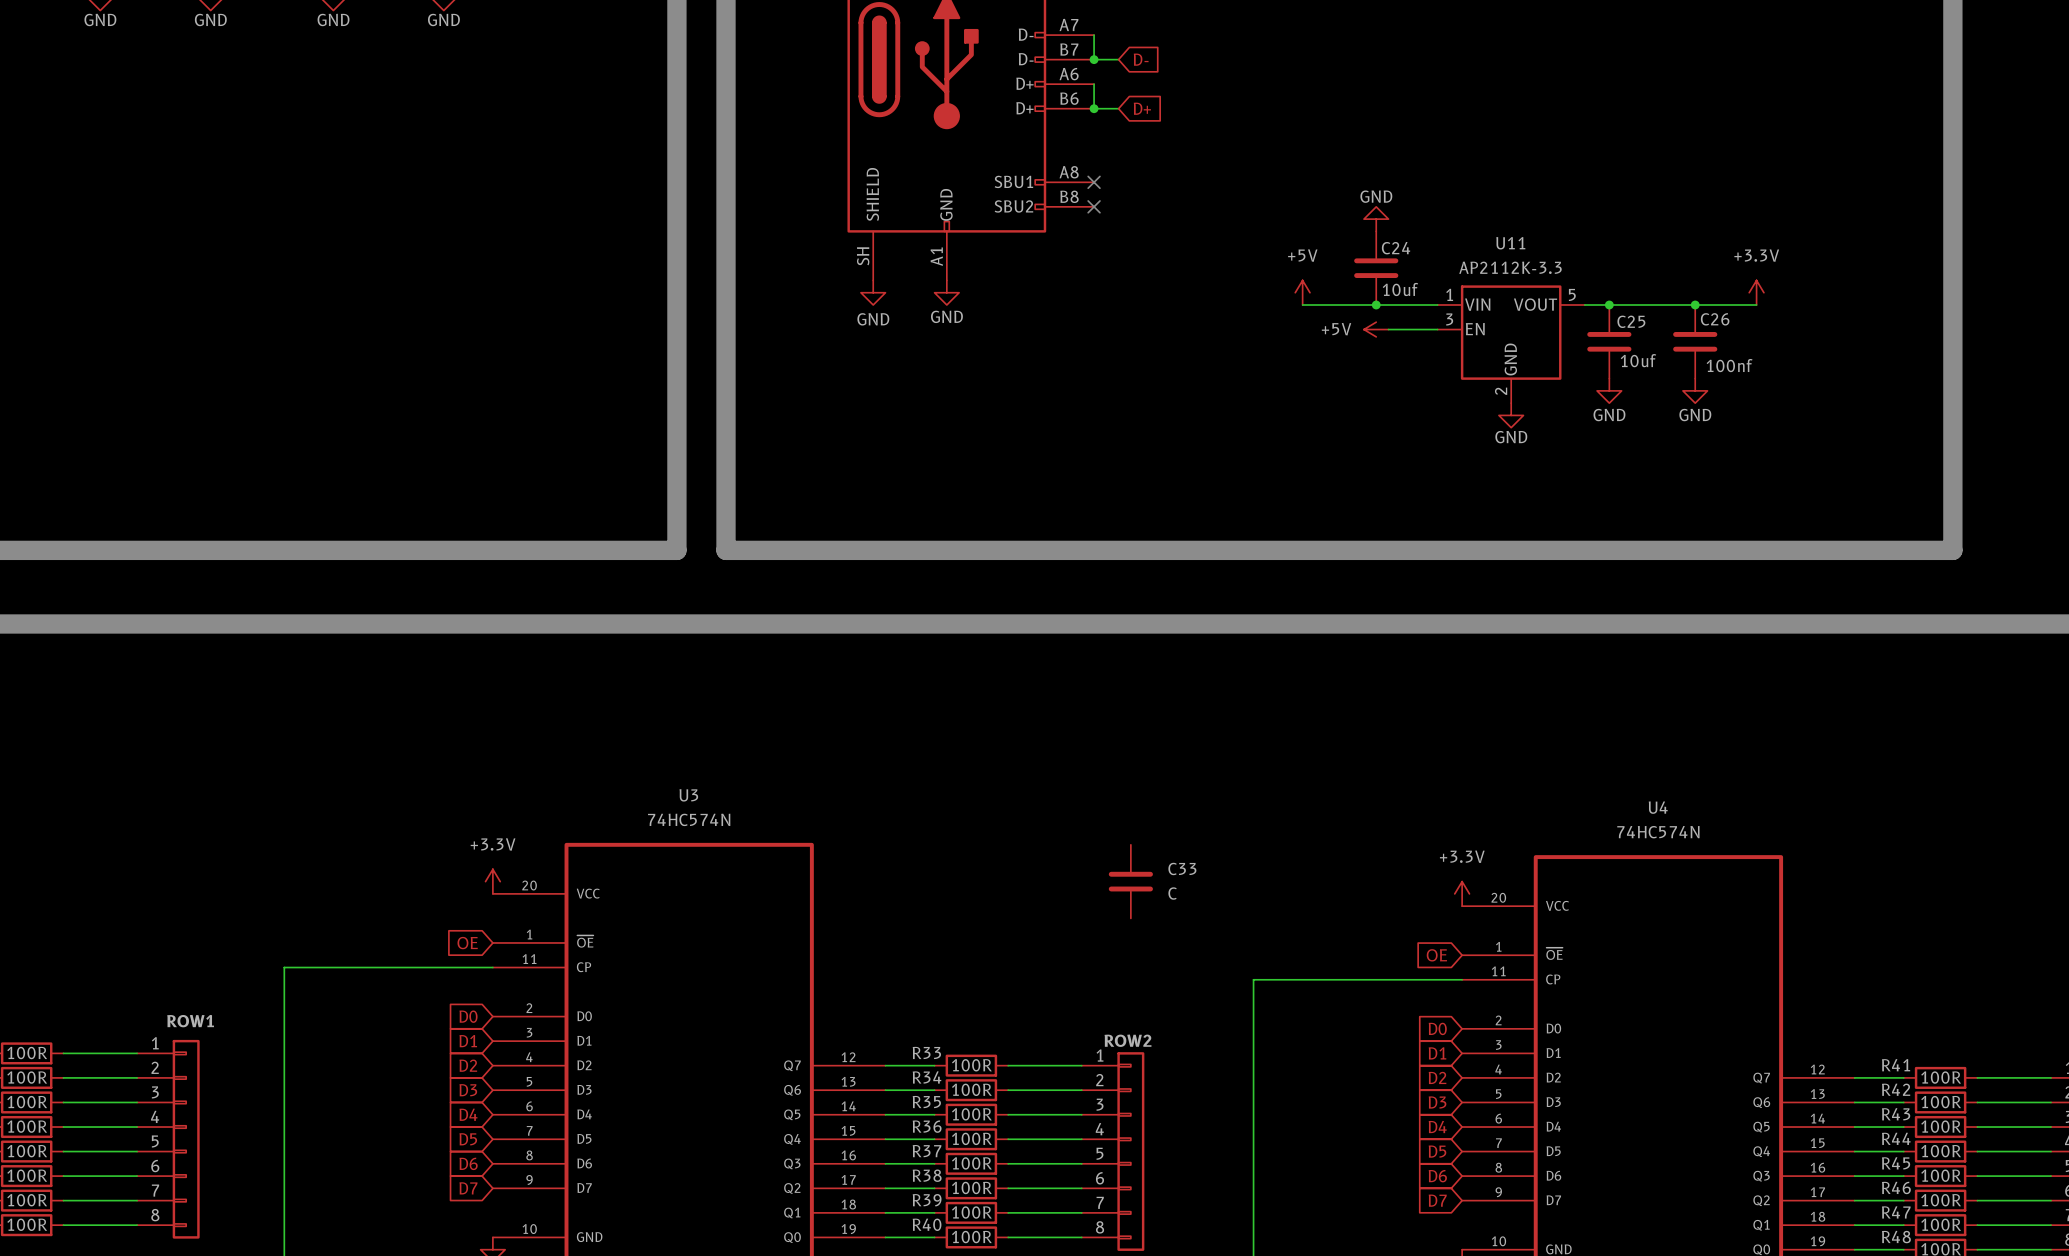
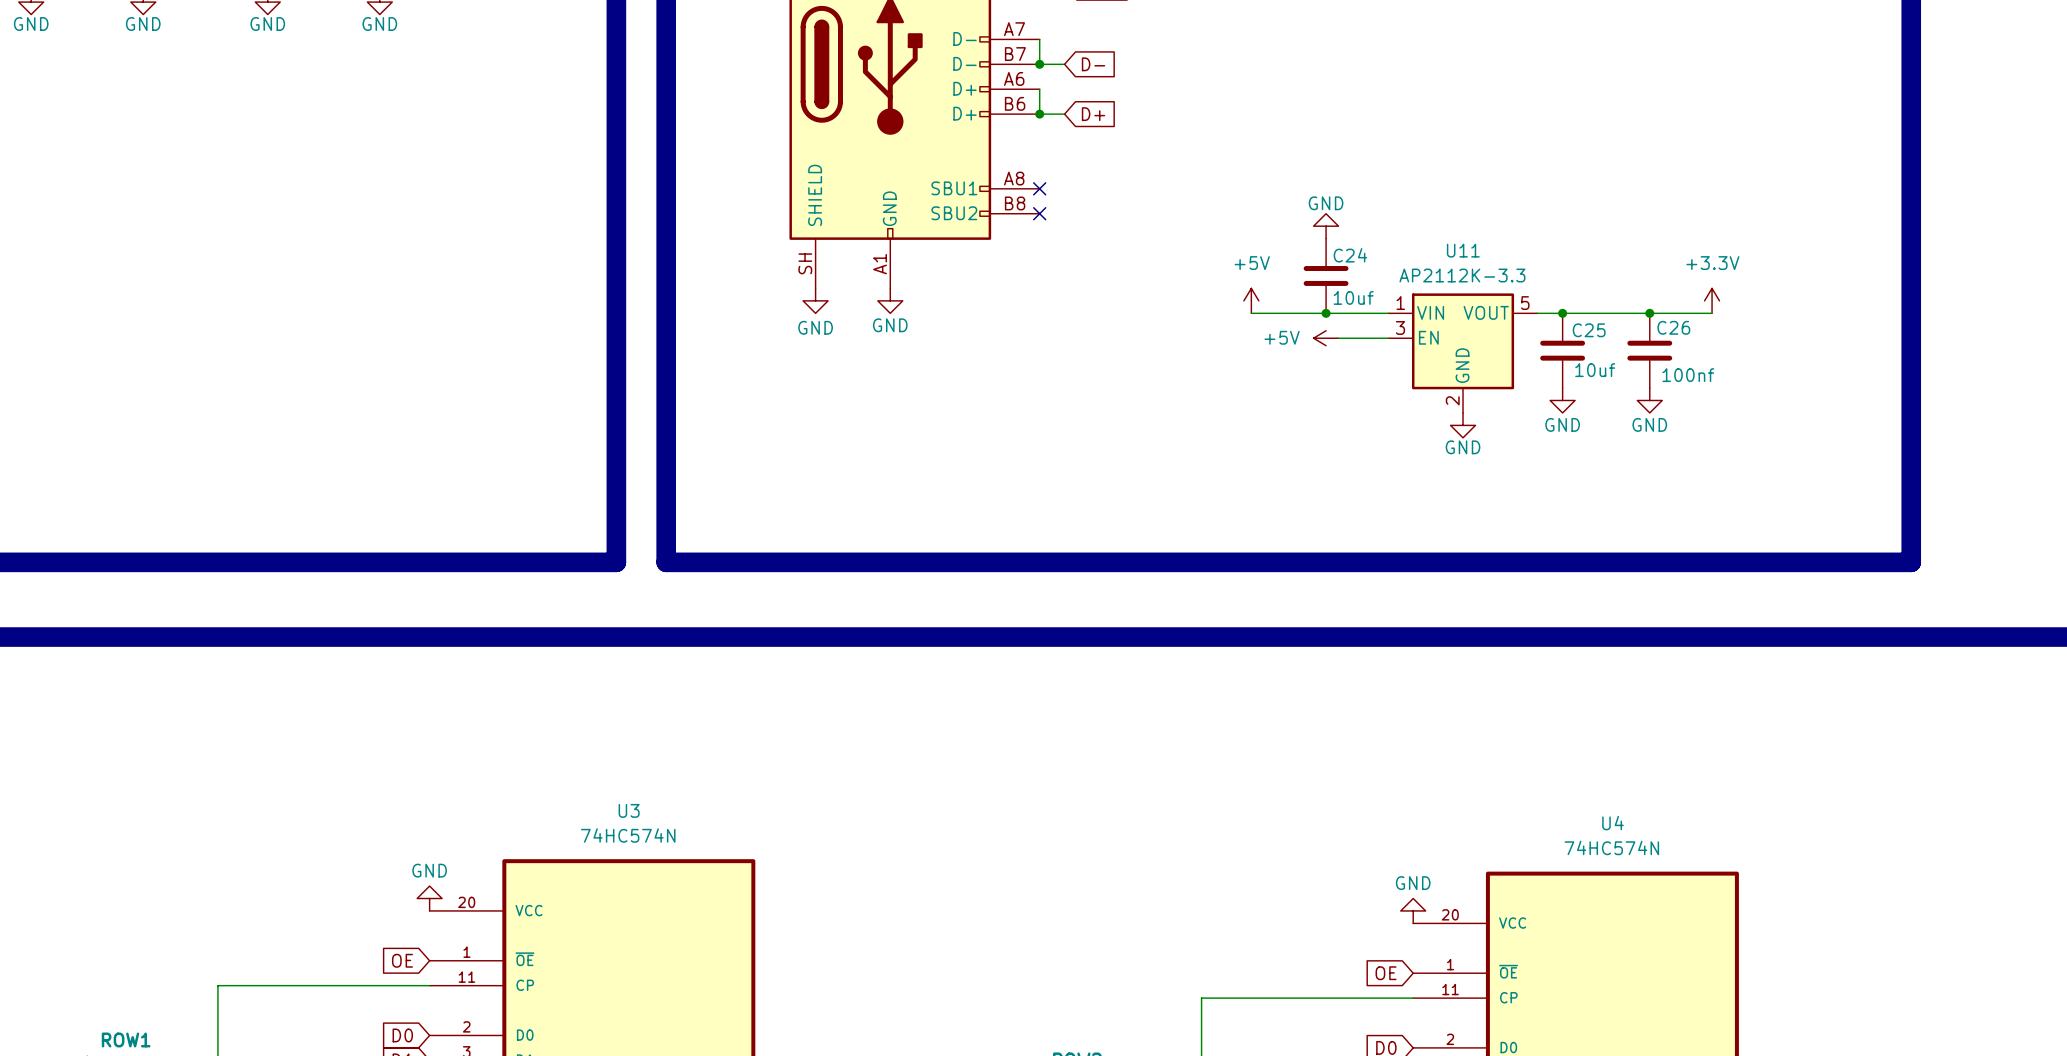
power symbol: +3.3V (492, 881) -> GND (429, 898)
C33: C (1130, 881) -> none
power symbol: +3.3V (1462, 893) -> GND (1413, 910)

